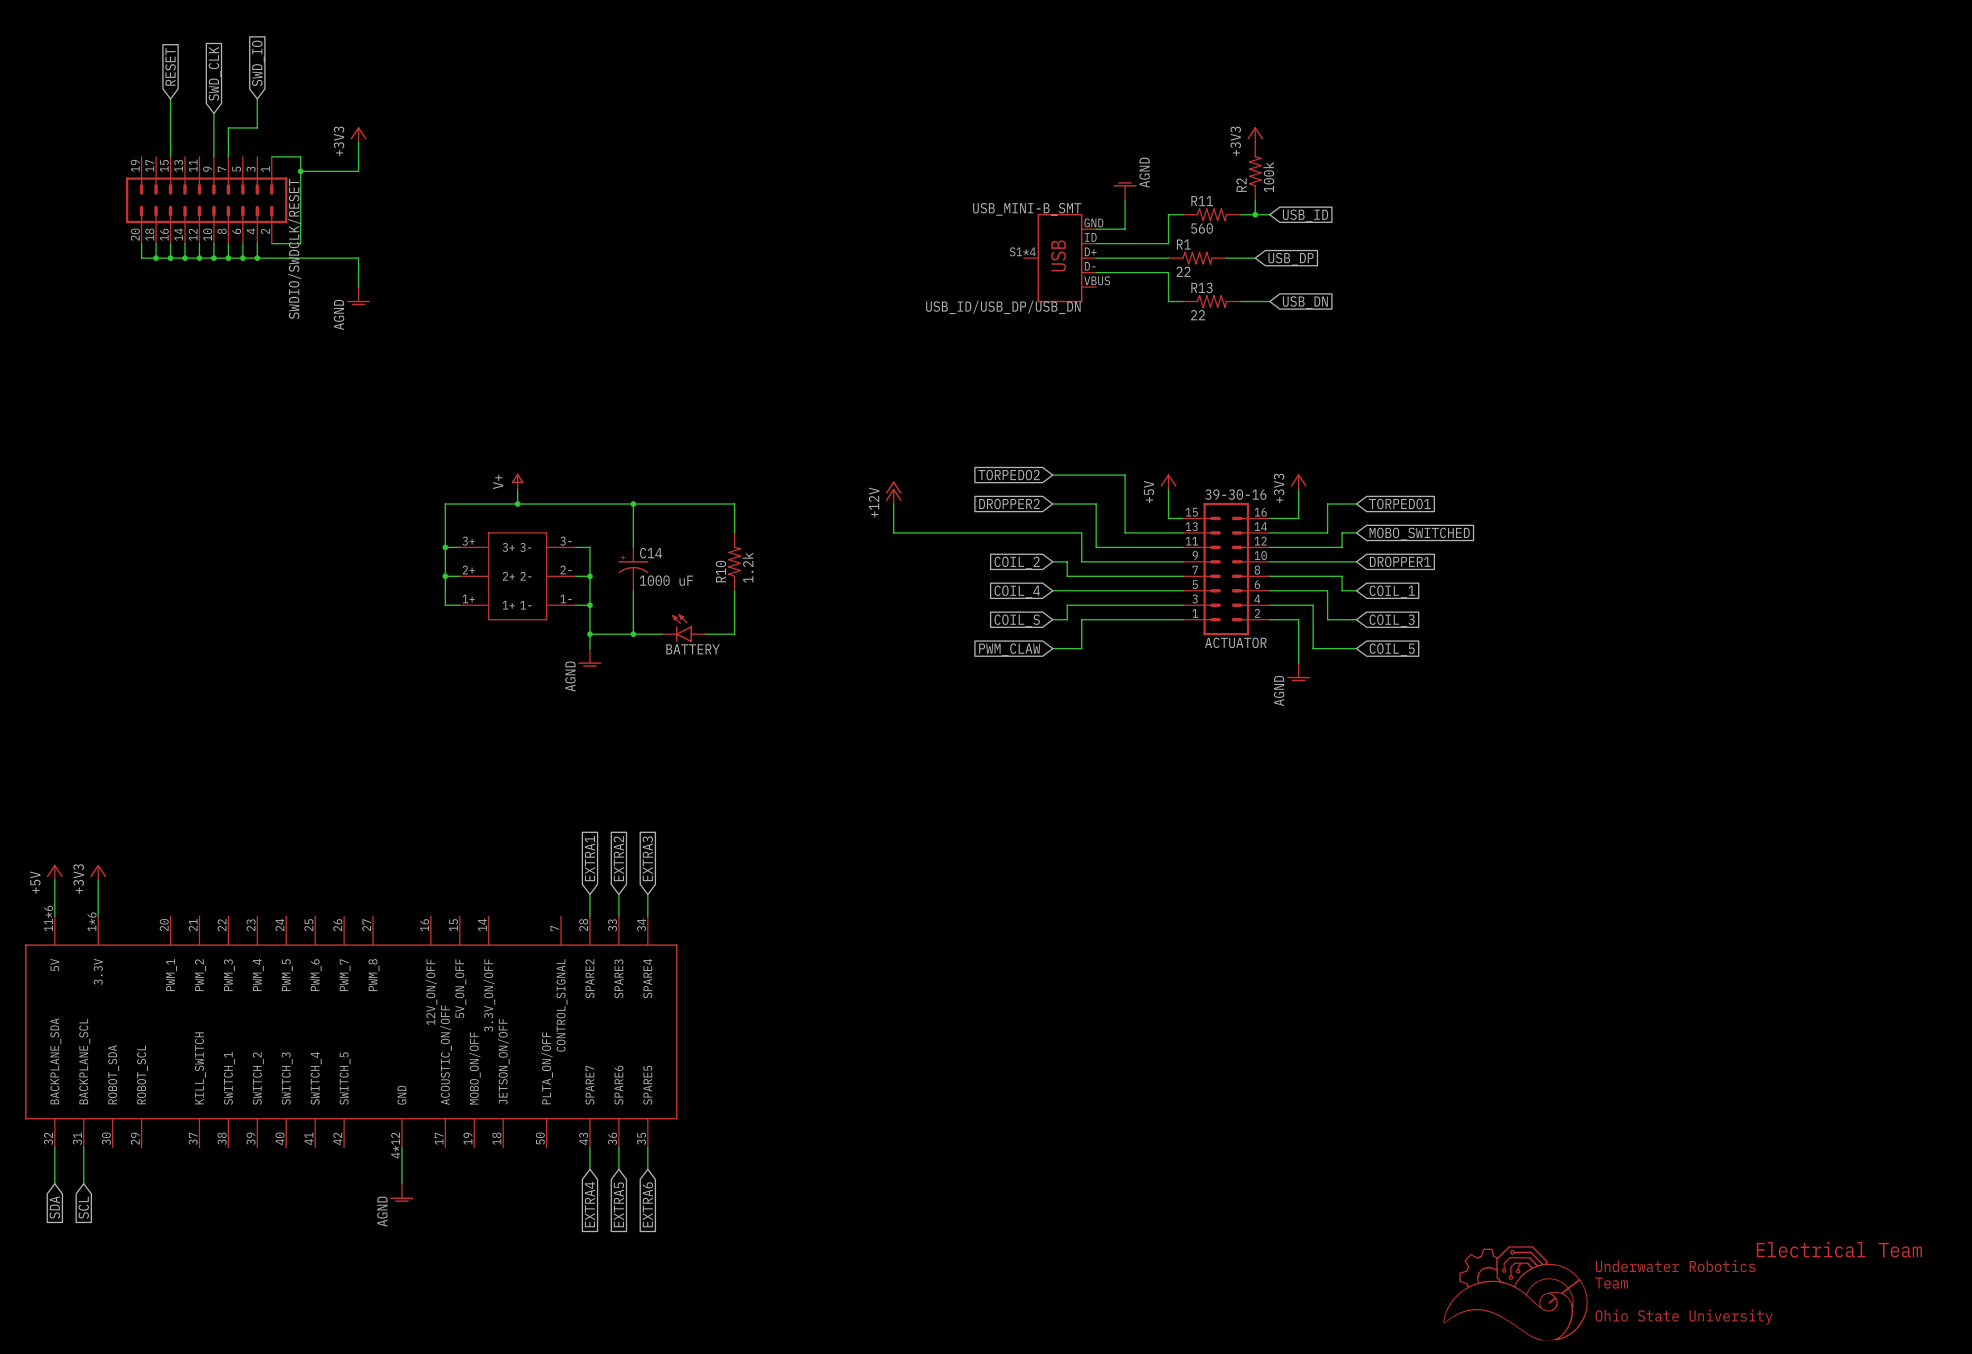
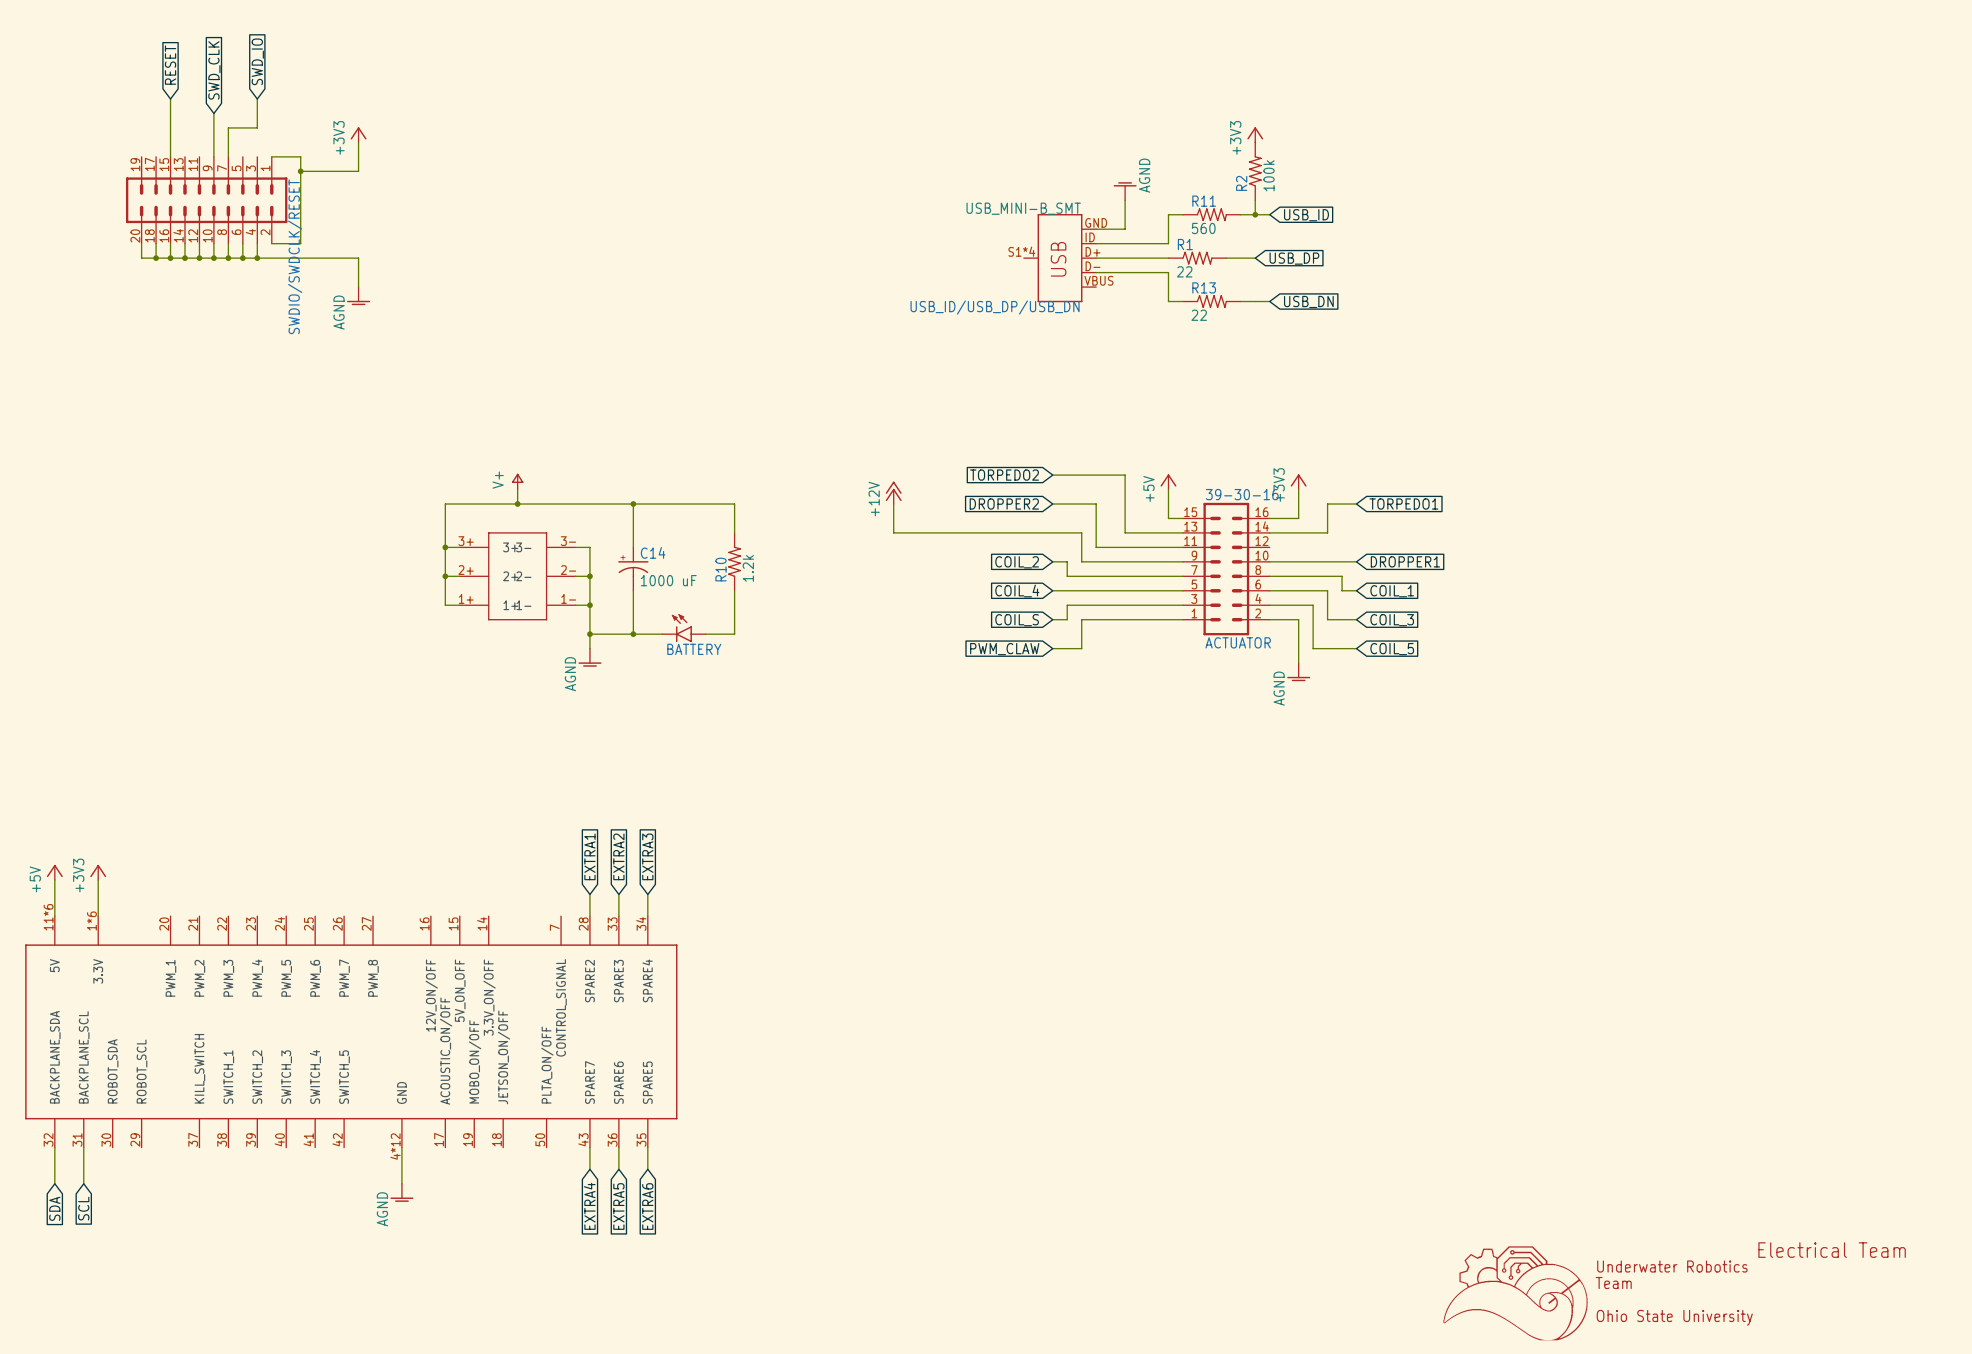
wire: (1356, 532) (1342, 532) (1342, 547) (1269, 547) -> none
global label: MOBO_SWITCHED (1419, 534) -> none

